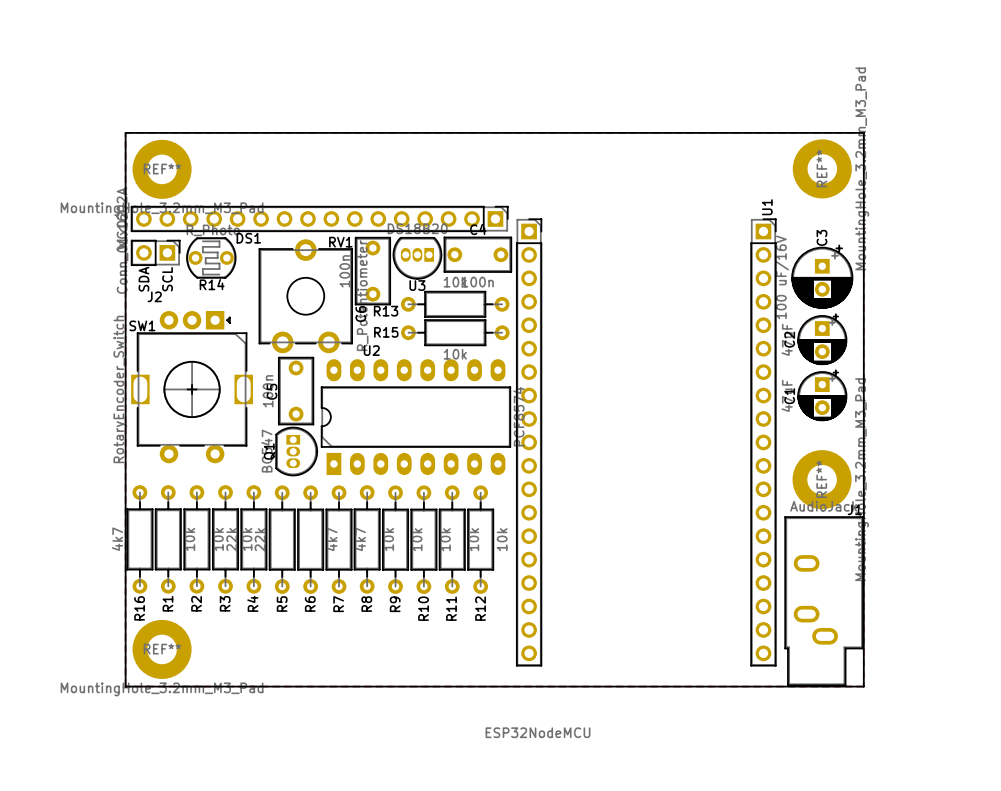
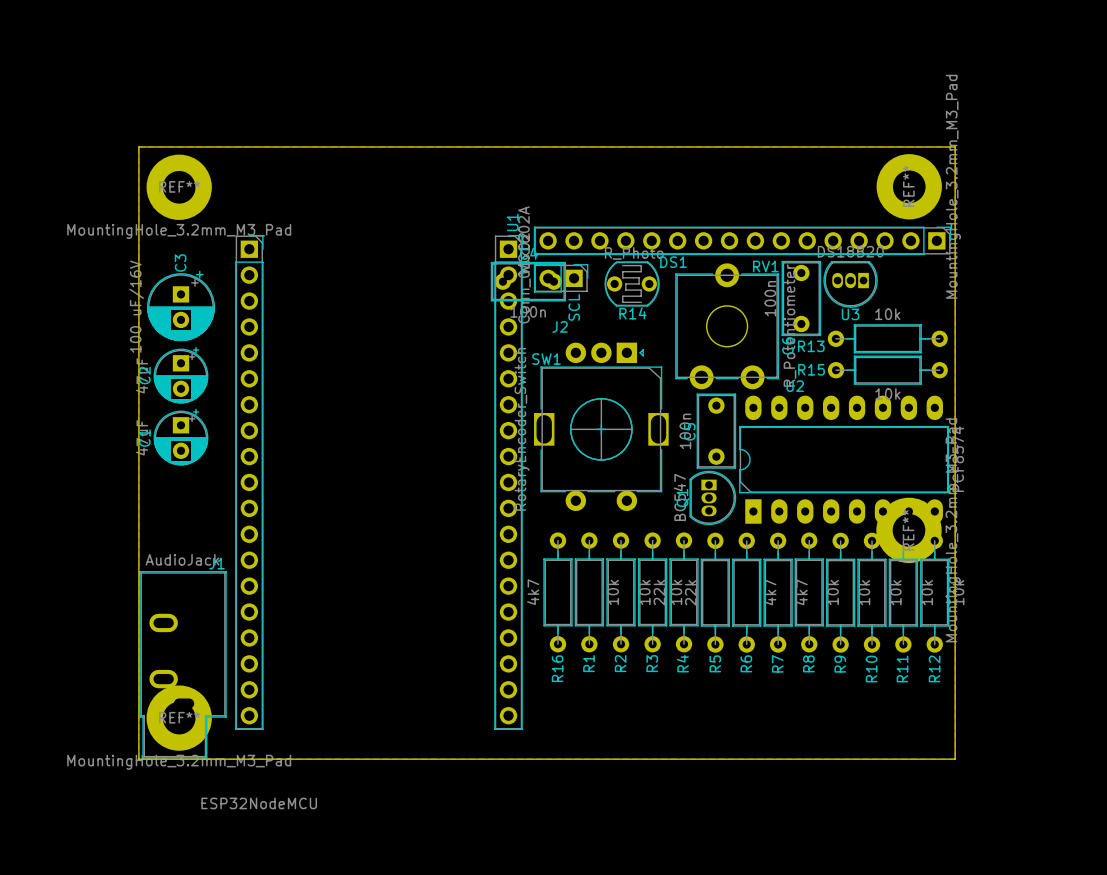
DS1 position: (319, 218) -> (742, 240)
DS1 name position: DS1 (248, 238) -> DS1 (673, 262)
J2 position: (155, 252) -> (561, 278)
R14 position: (211, 258) -> (632, 284)
U3 position: (417, 258) -> (850, 284)
C6 position: (372, 271) -> (801, 298)
C3 position: (822, 276) -> (180, 305)
text: none -> SCL (574, 307)
text: SDA (143, 279) -> none
text: SCL (167, 279) -> none
RV1 position: (305, 296) -> (727, 326)
R13 position: (455, 304) -> (887, 338)
R15 position: (455, 332) -> (887, 370)
C2 position: (822, 339) -> (180, 375)
SW1 position: (192, 387) -> (601, 426)
C5 position: (296, 391) -> (716, 431)
C1 position: (822, 395) -> (180, 437)
U2 position: (415, 417) -> (844, 459)
U1 position: (646, 442) -> (378, 482)
Q1 position: (296, 451) -> (712, 497)
R16 position: (139, 539) -> (558, 592)
R1 position: (168, 539) -> (589, 592)
R2 position: (196, 539) -> (621, 592)
R3 position: (225, 539) -> (652, 592)
R4 position: (253, 539) -> (684, 592)
R5 position: (282, 539) -> (715, 592)
R6 position: (310, 539) -> (746, 592)
R7 position: (339, 539) -> (778, 592)
R8 position: (367, 539) -> (809, 592)
R9 position: (395, 539) -> (840, 592)
R10 position: (423, 539) -> (872, 592)
R11 position: (452, 539) -> (903, 592)
R12 position: (480, 539) -> (934, 592)
J1 position: (824, 601) -> (183, 664)

